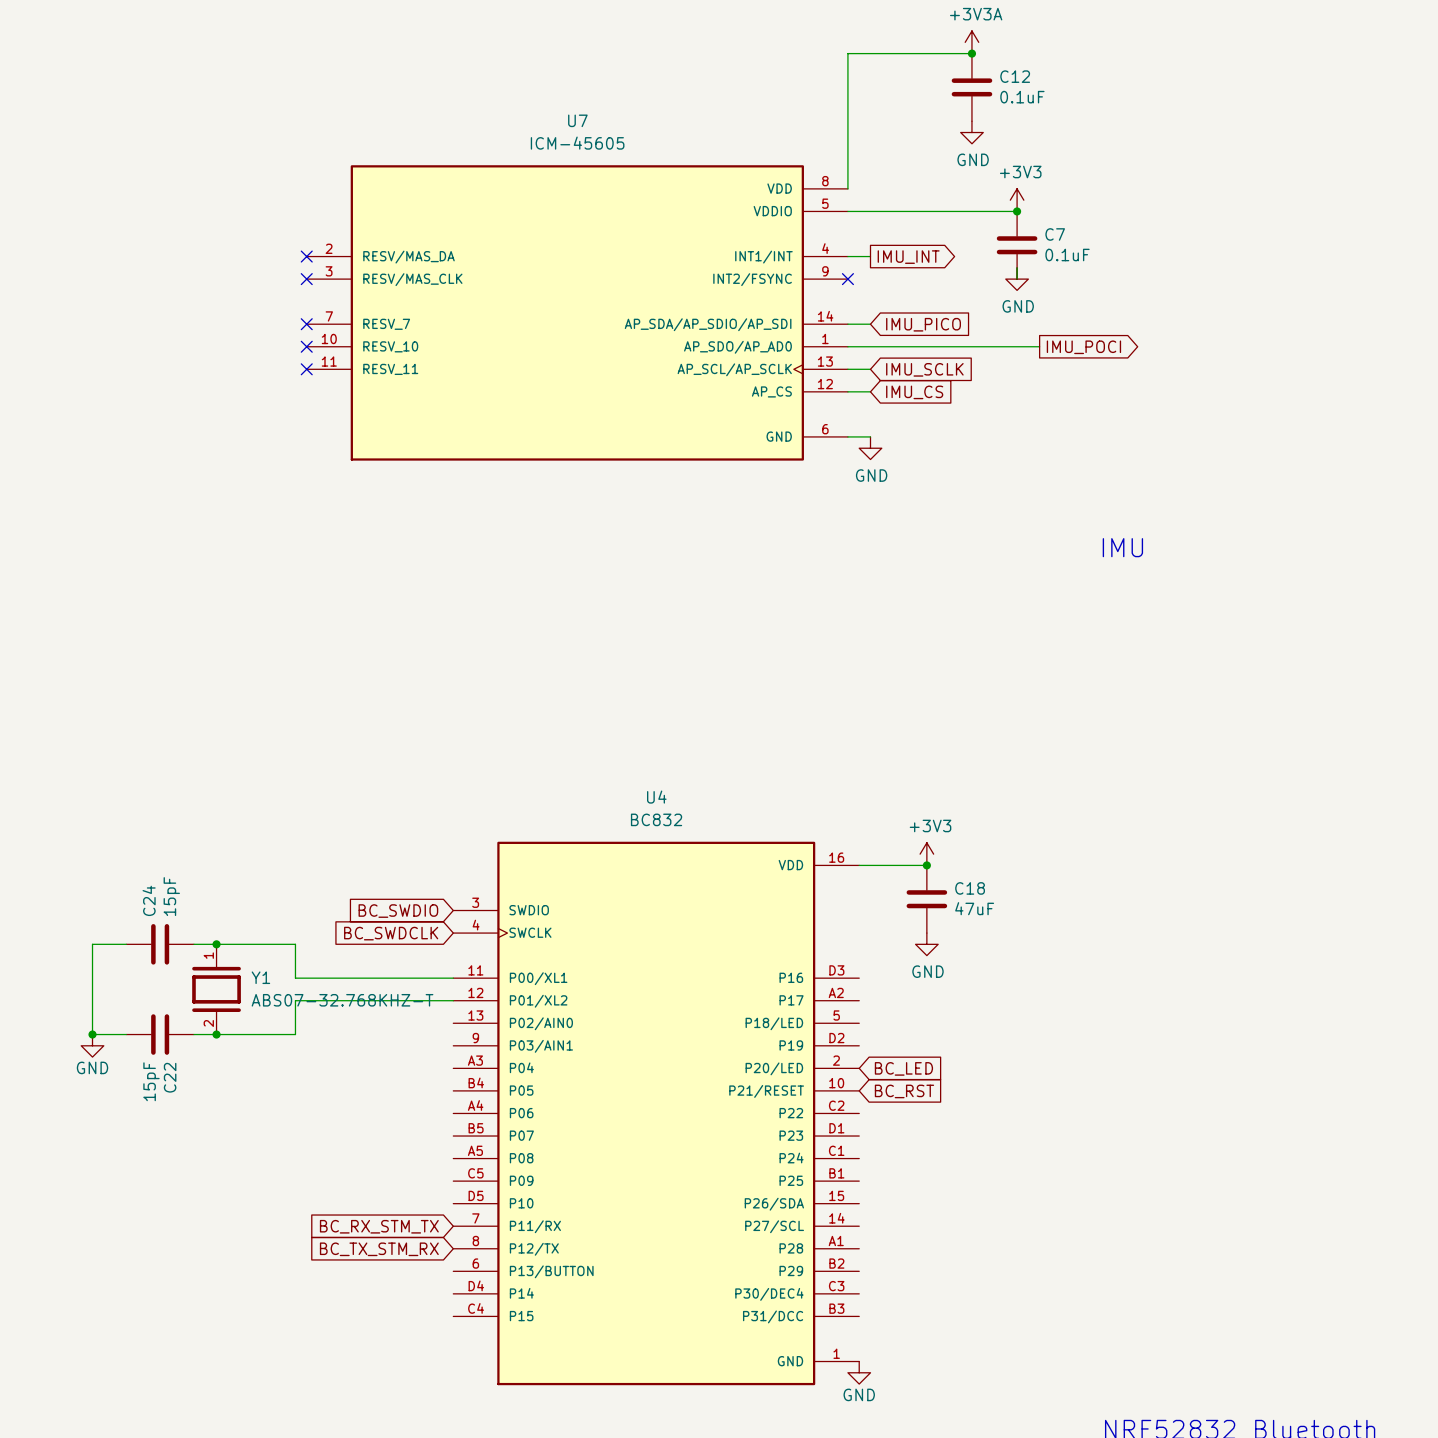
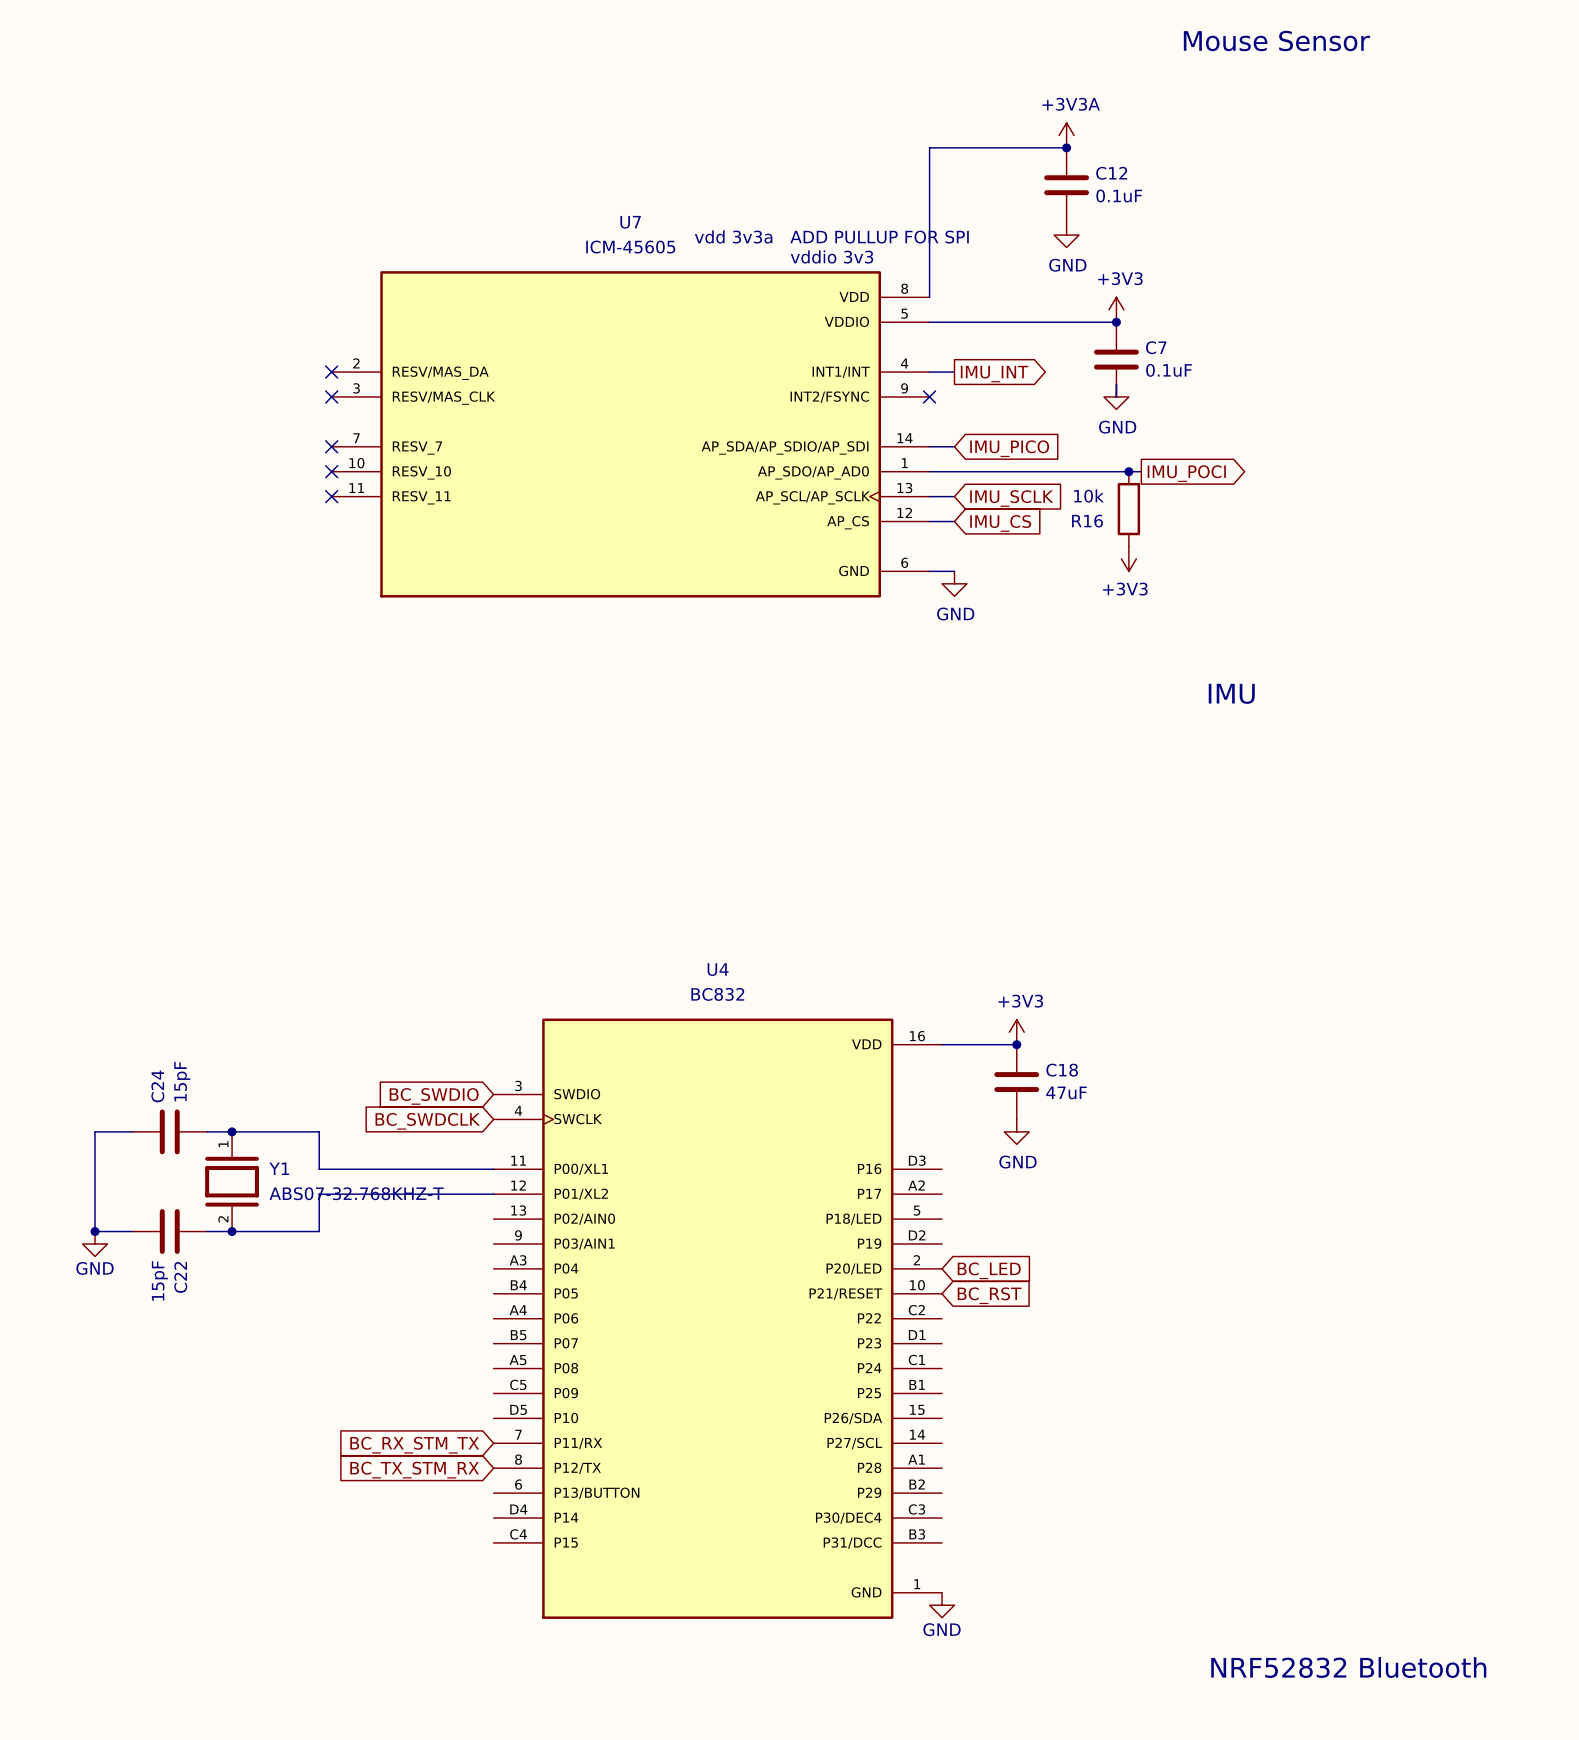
text: none -> vdd 3v3a ADD PULLUP FOR SPI (831, 236)
text: none -> vddio 3v3 (831, 256)
junction: none -> (1128, 471)
R16: none -> 10k (1128, 509)
power symbol: none -> +3V3 (1128, 558)

